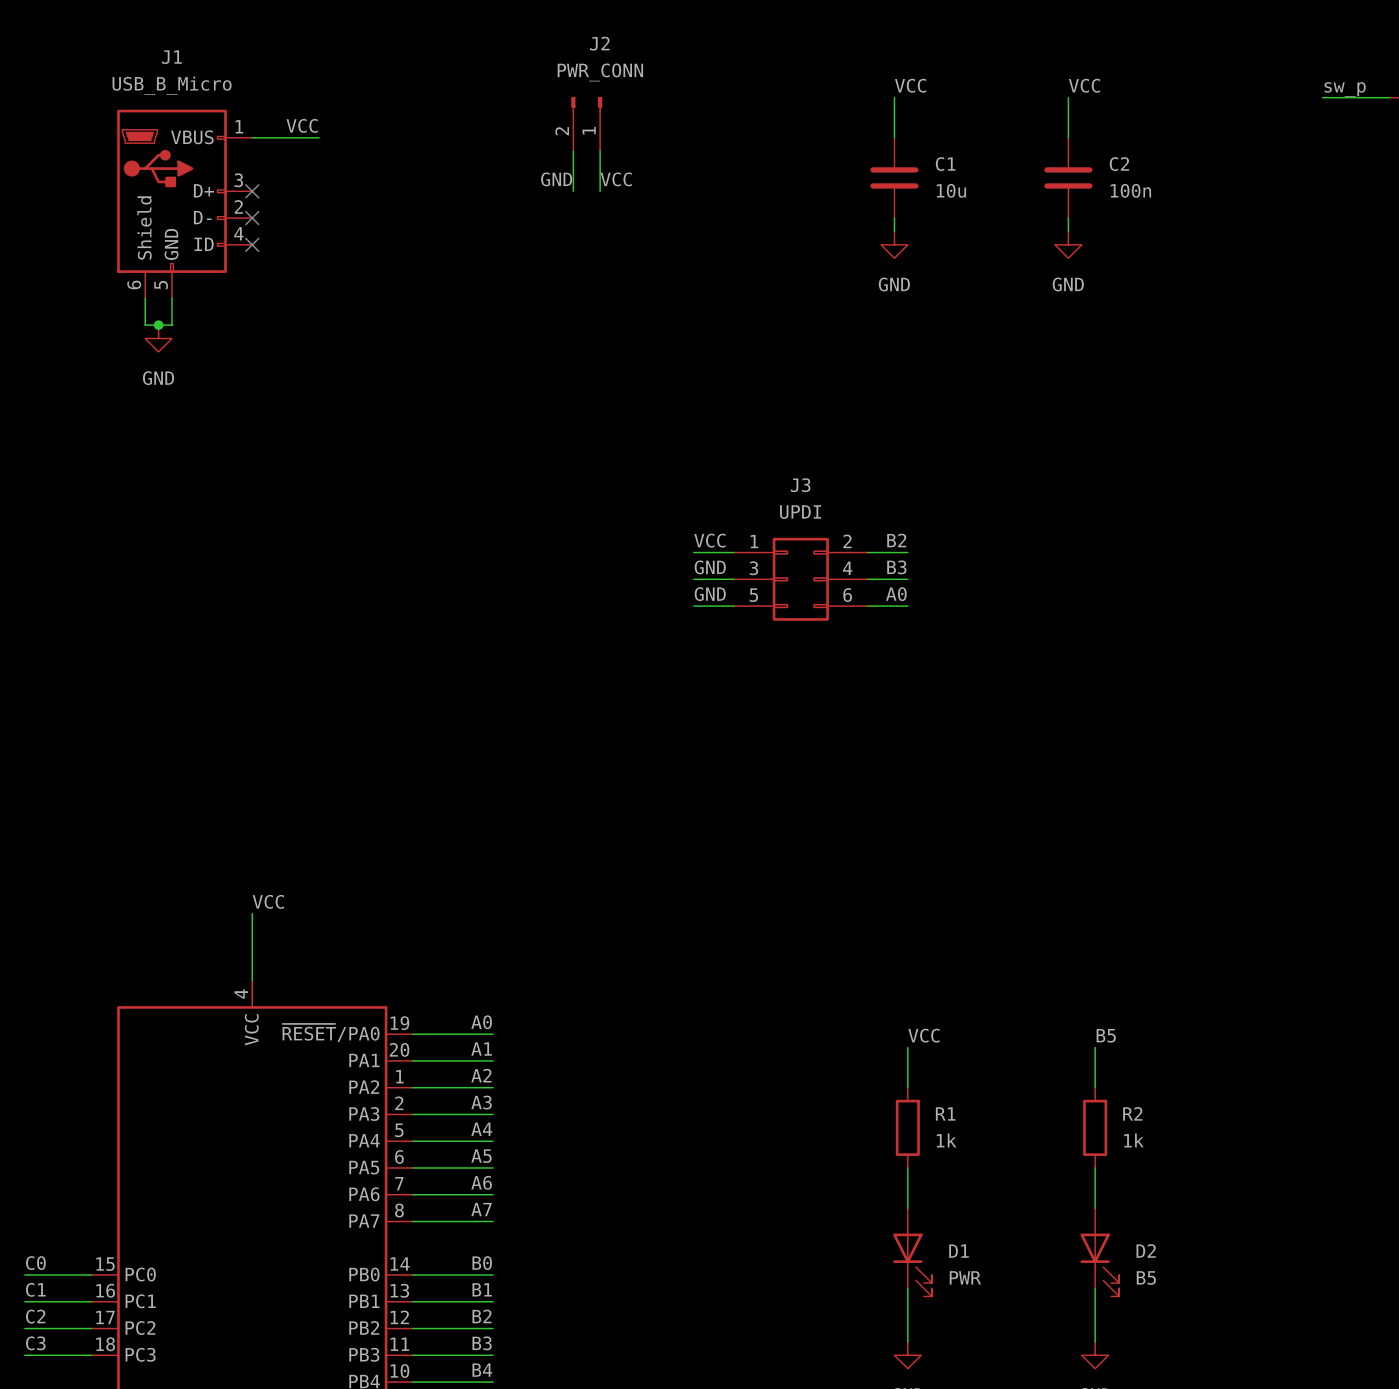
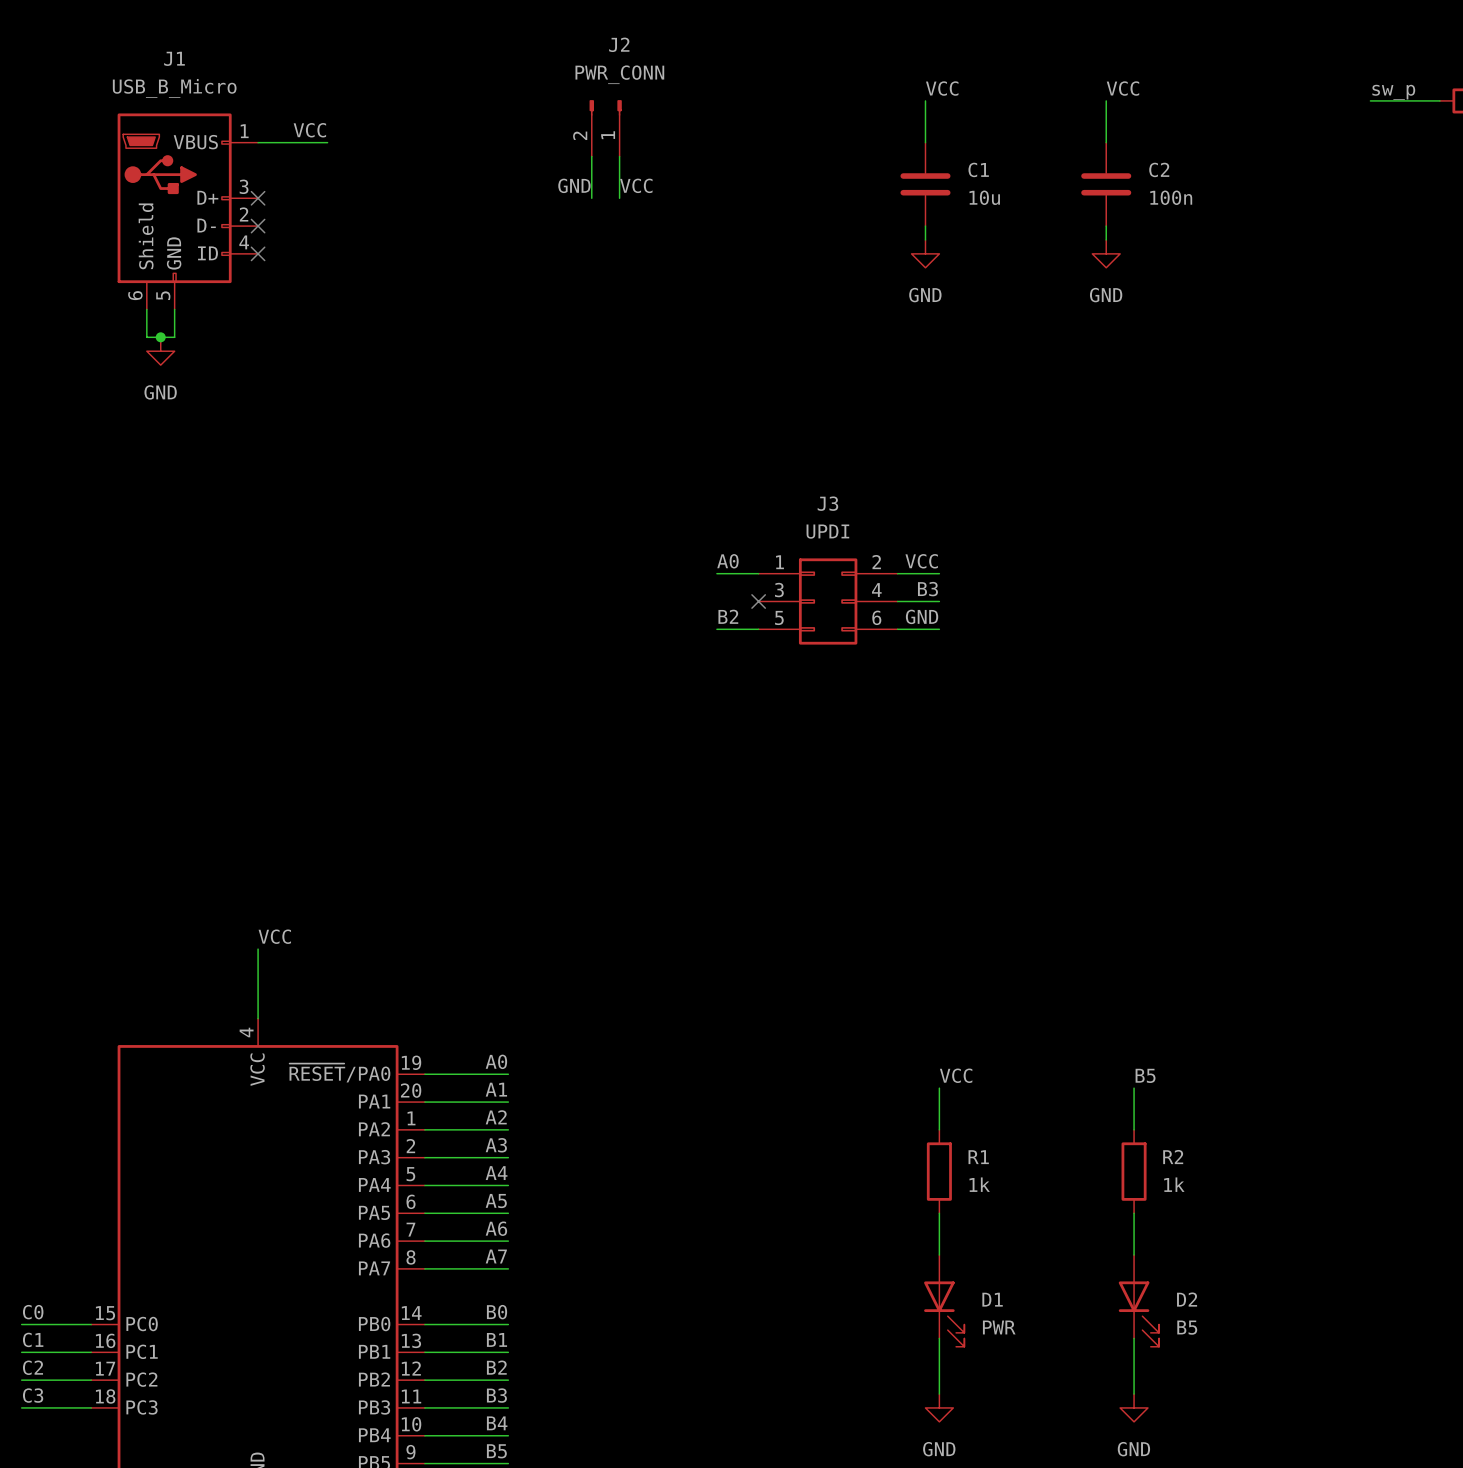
label: VCC (709, 540) -> A0 (727, 561)
label: B2 (896, 540) -> VCC (921, 561)
label: GND (710, 567) -> none
wire: (693, 579) (733, 579) -> none
no-connect mark: none -> (758, 601)
label: GND (710, 594) -> B2 (728, 616)
label: A0 (896, 594) -> GND (922, 616)

